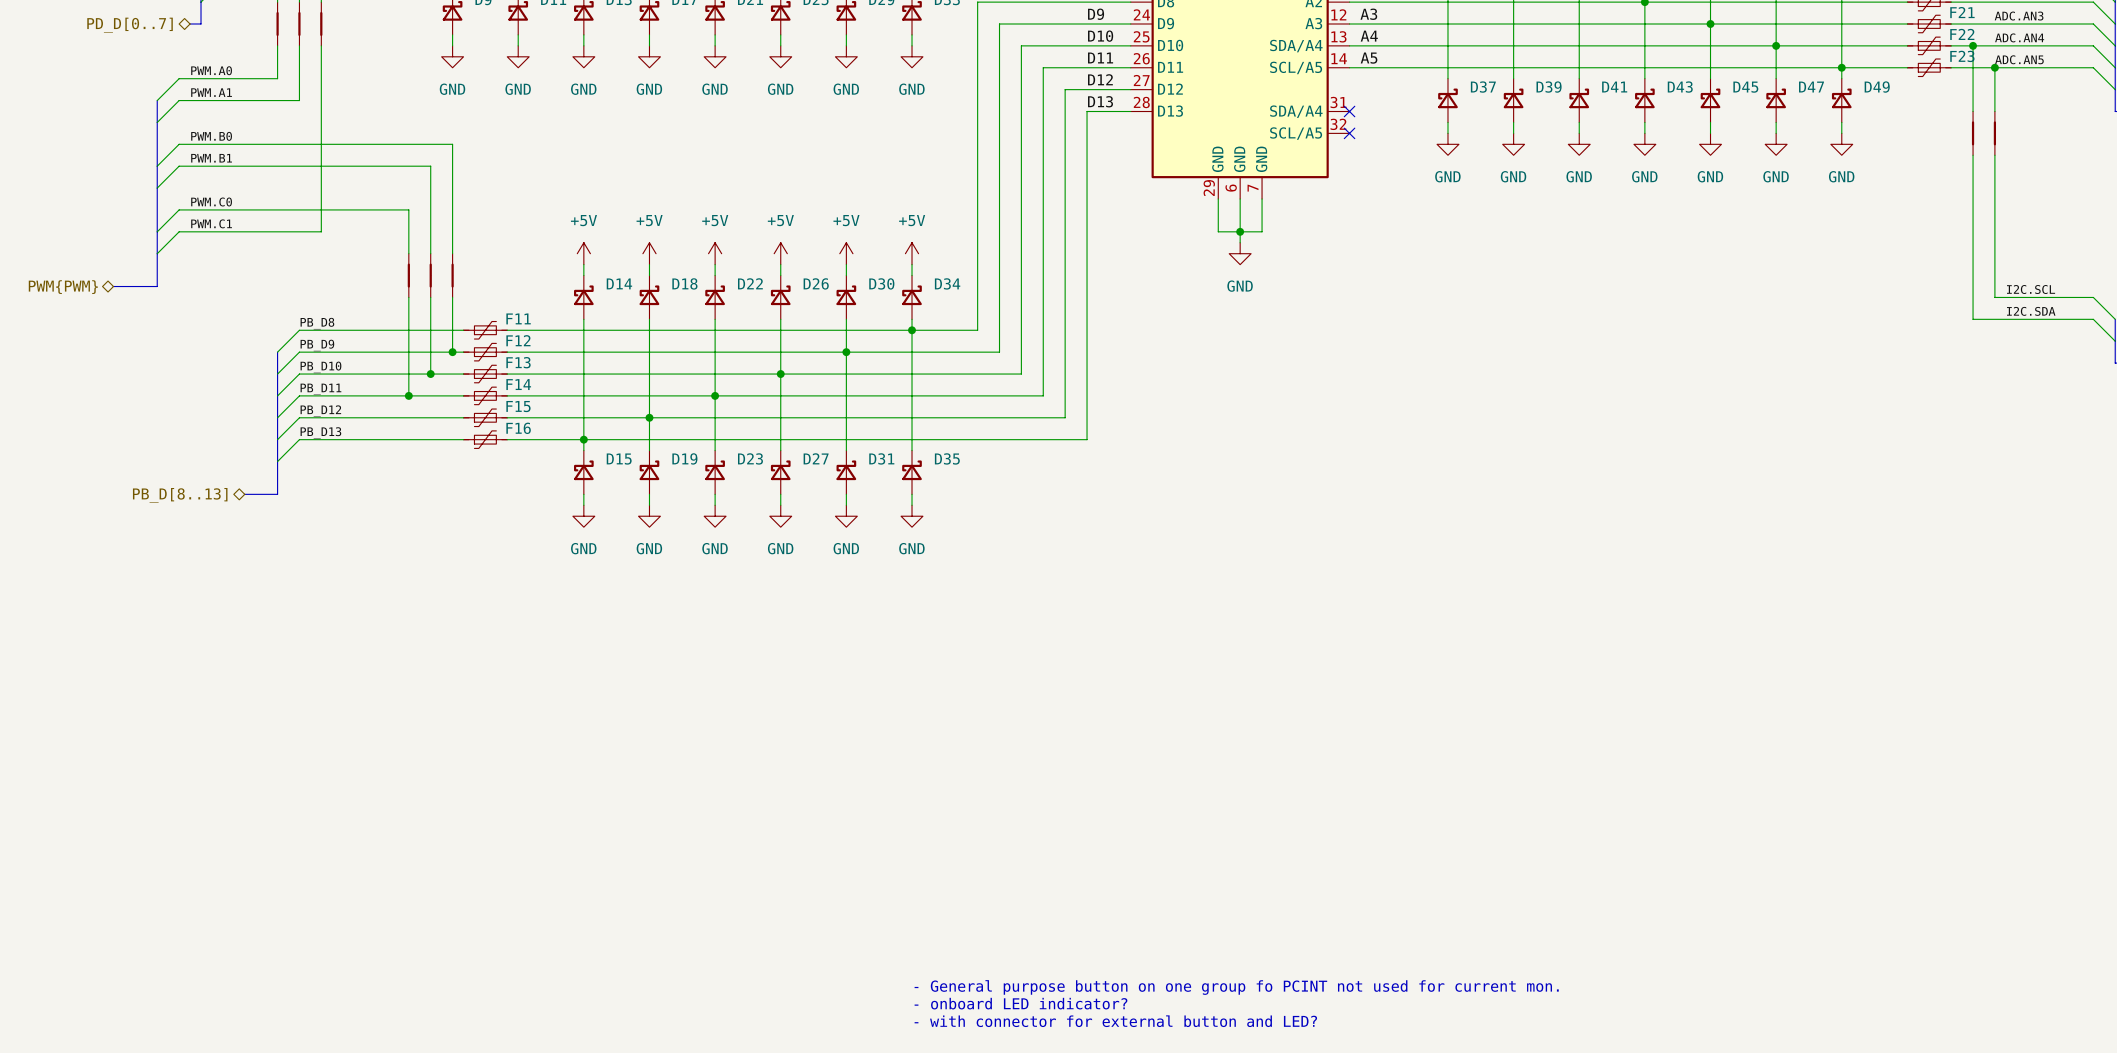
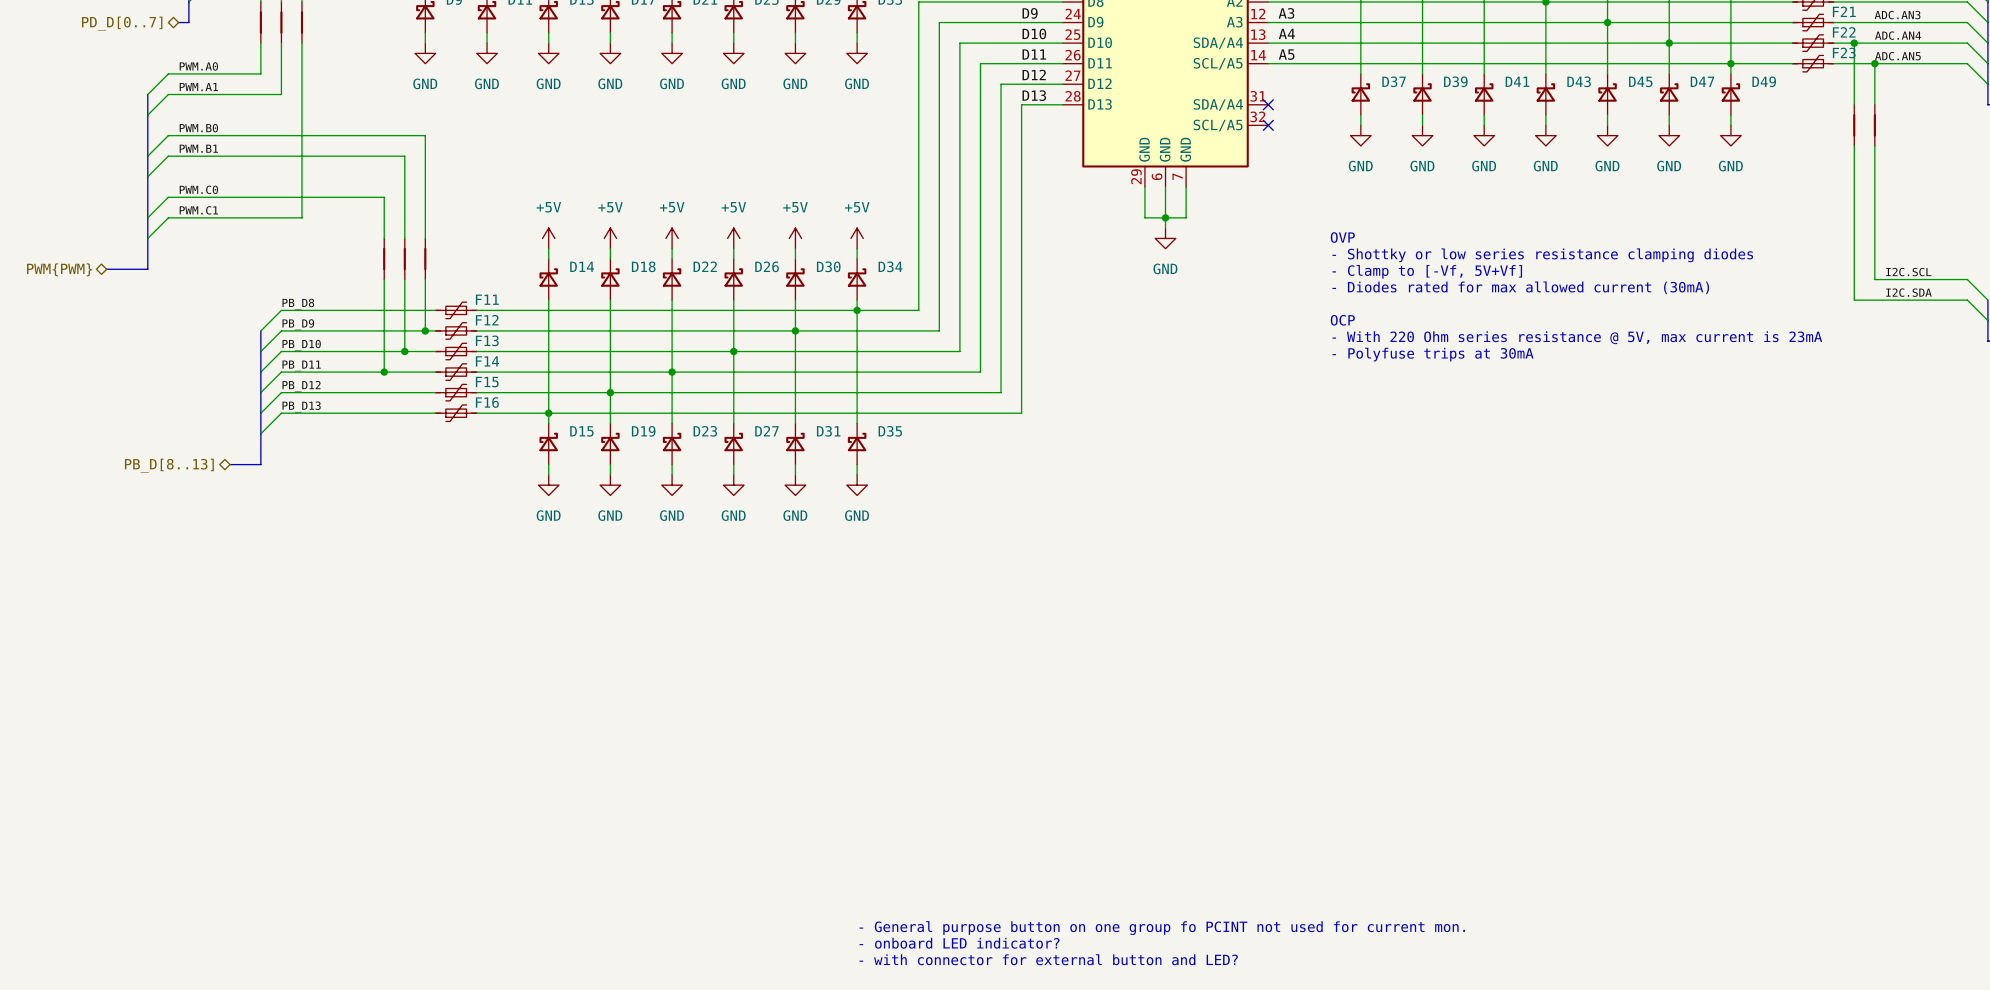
text: none -> OVP (1342, 237)
text: none -> - Shottky or low series resistance clamping diodes (1542, 255)
text: none -> - Clamp to [-Vf, 5V+Vf] (1427, 271)
text: none -> - Diodes rated for max allowed current (30mA) (1520, 287)
text: none -> OCP (1342, 320)
text: none -> - With 220 Ohm series resistance @ 5V, max current is 23mA (1577, 337)
text: none -> - Polyfuse trips at 30mA (1432, 354)

